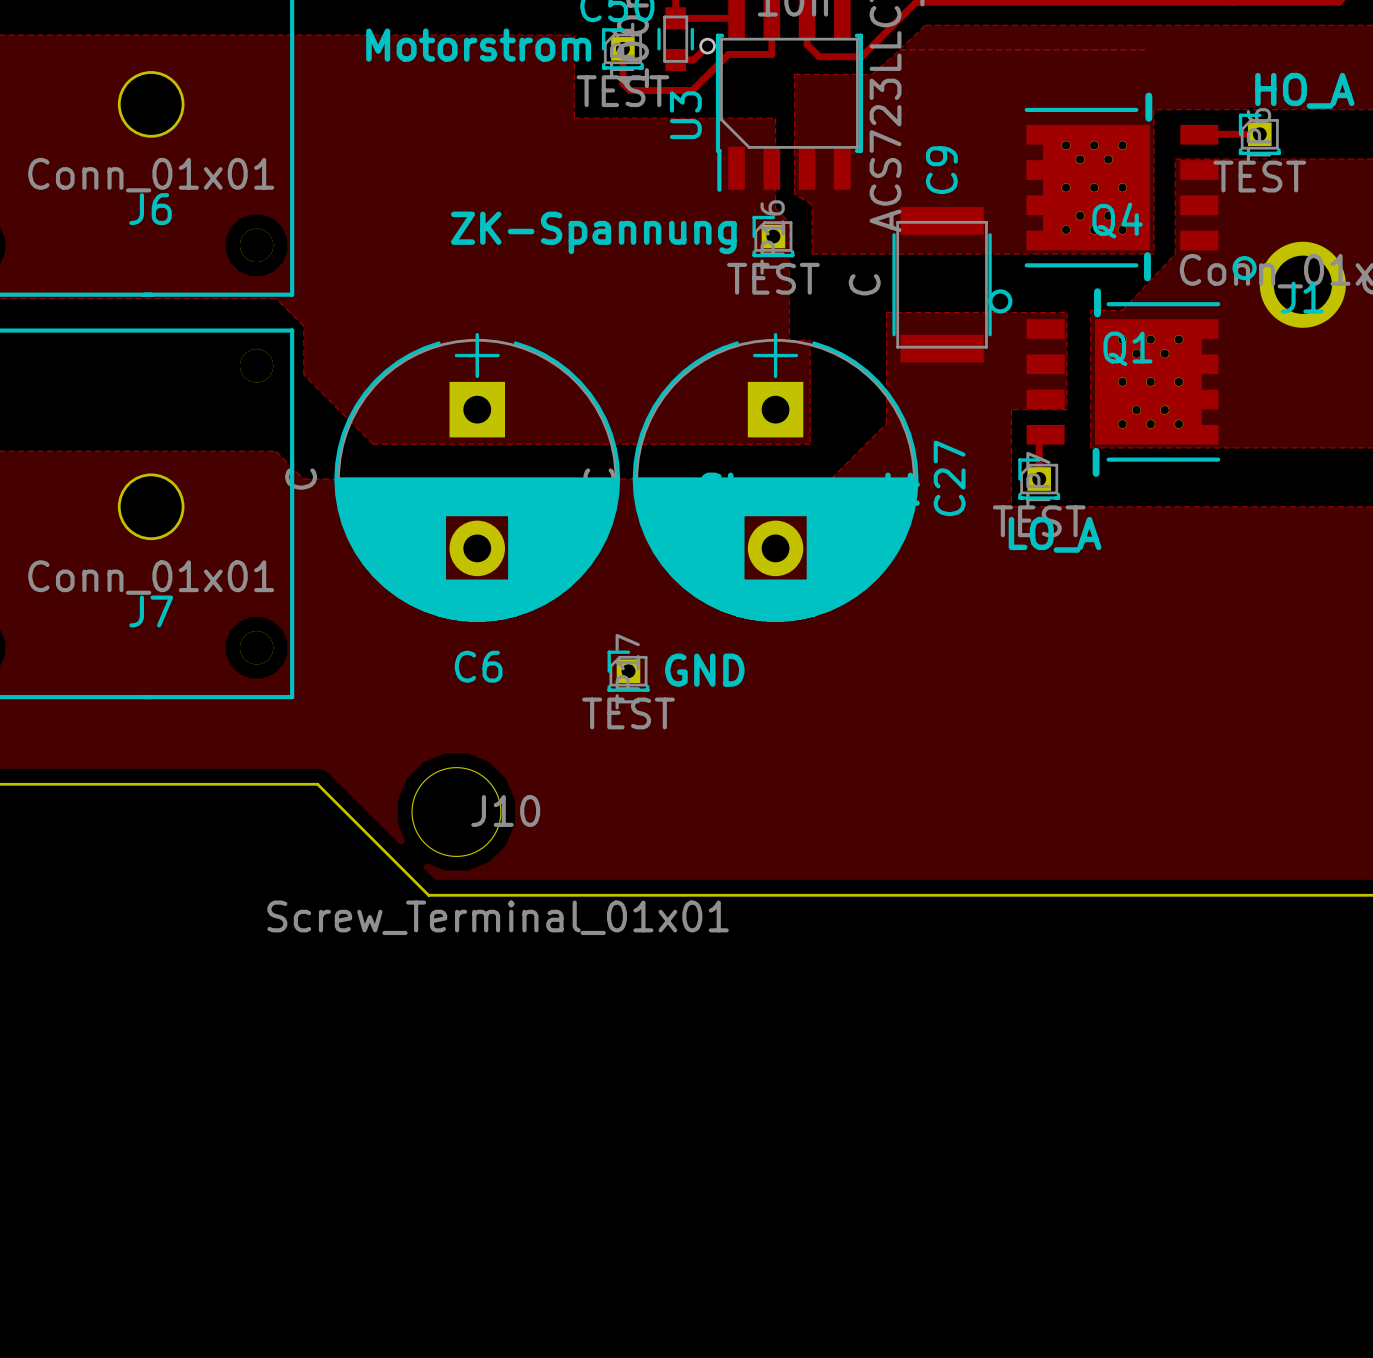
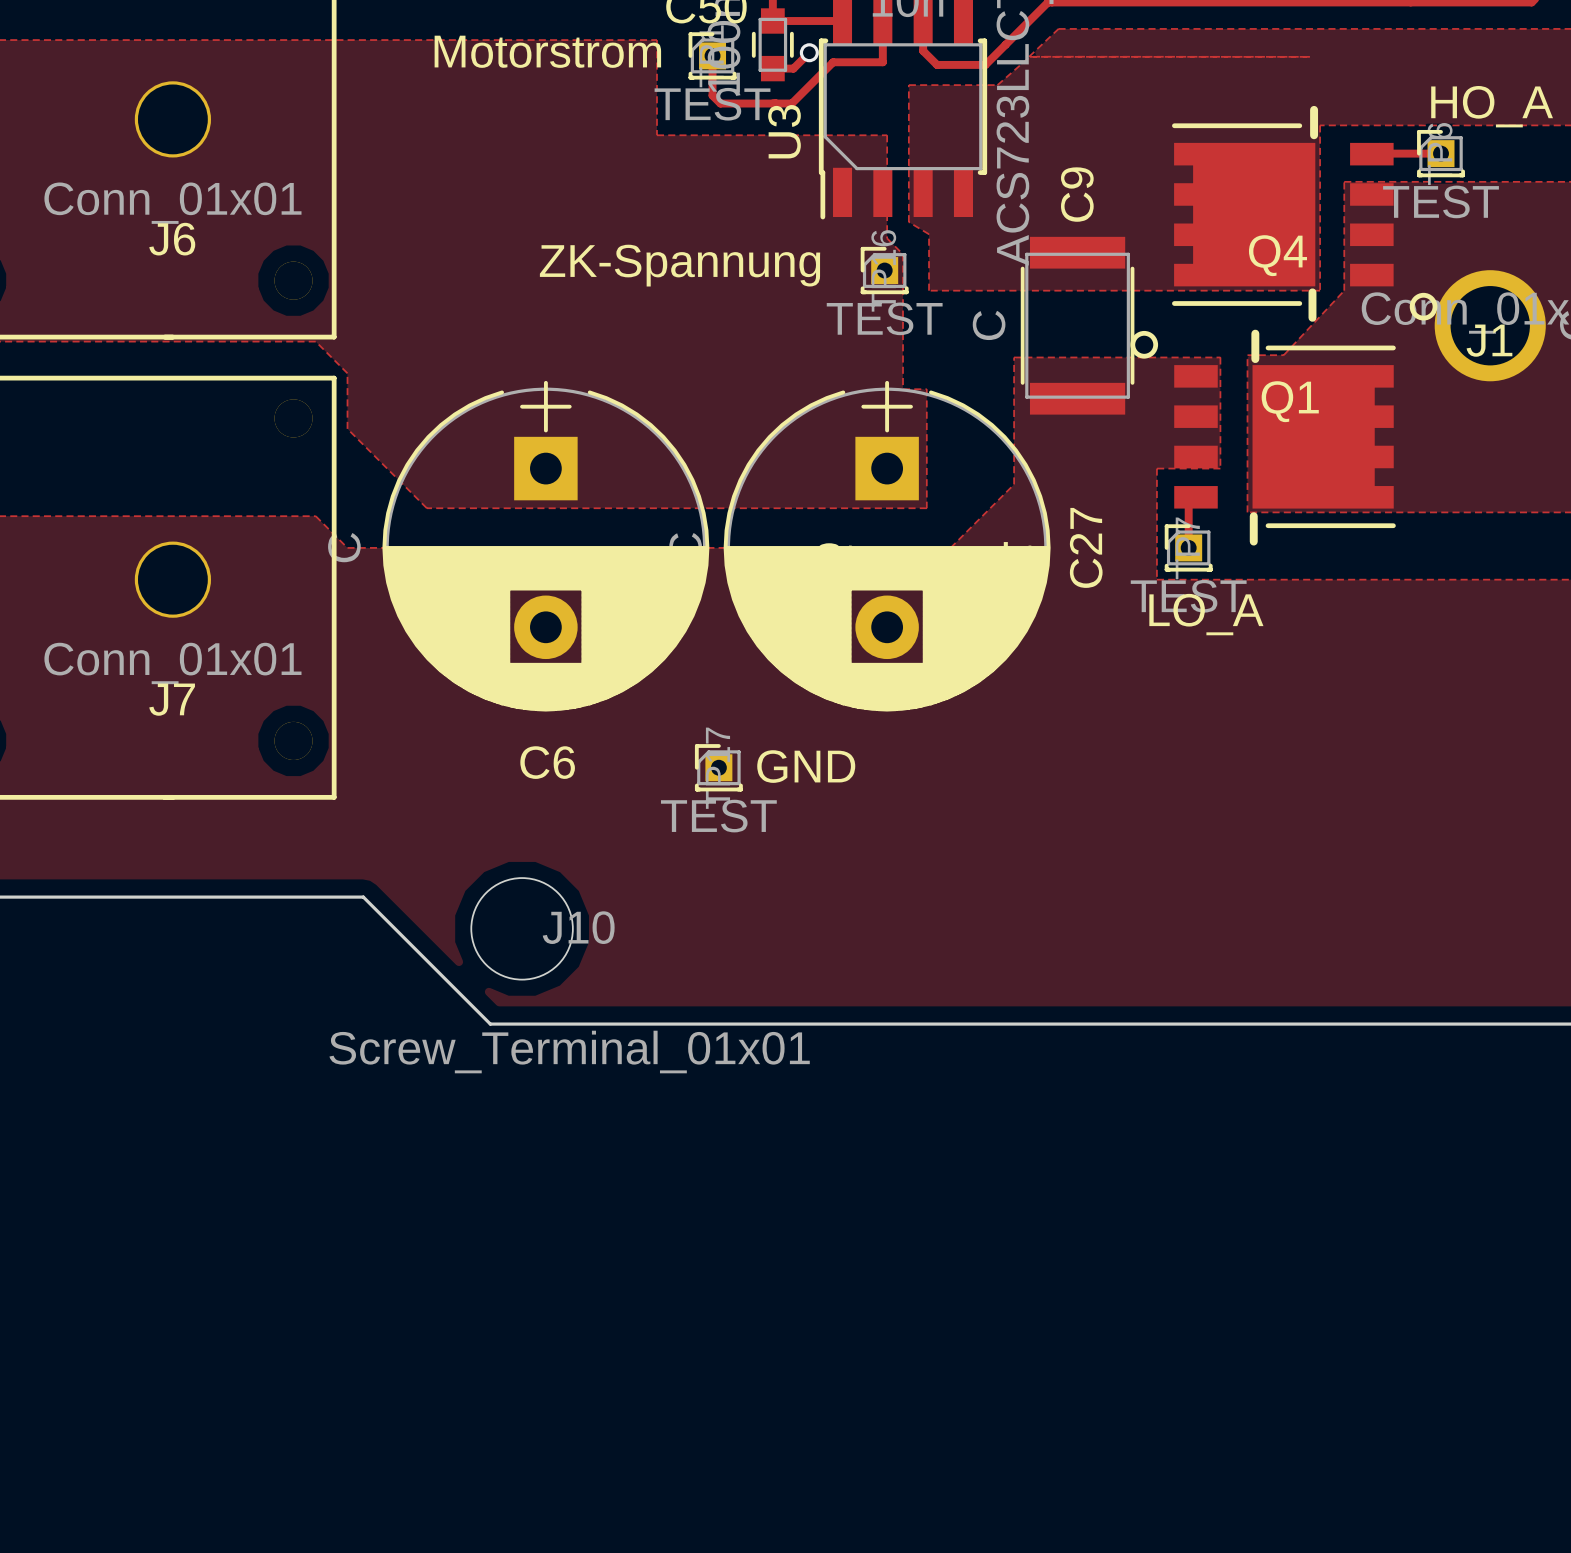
Q1 footprint: [1024, 92, 1257, 282] -> [1172, 105, 1438, 322]
J1 footprint: [1259, 241, 1346, 328] -> [1434, 270, 1546, 382]
Q4 footprint: [988, 288, 1221, 477] -> [1130, 329, 1396, 546]

